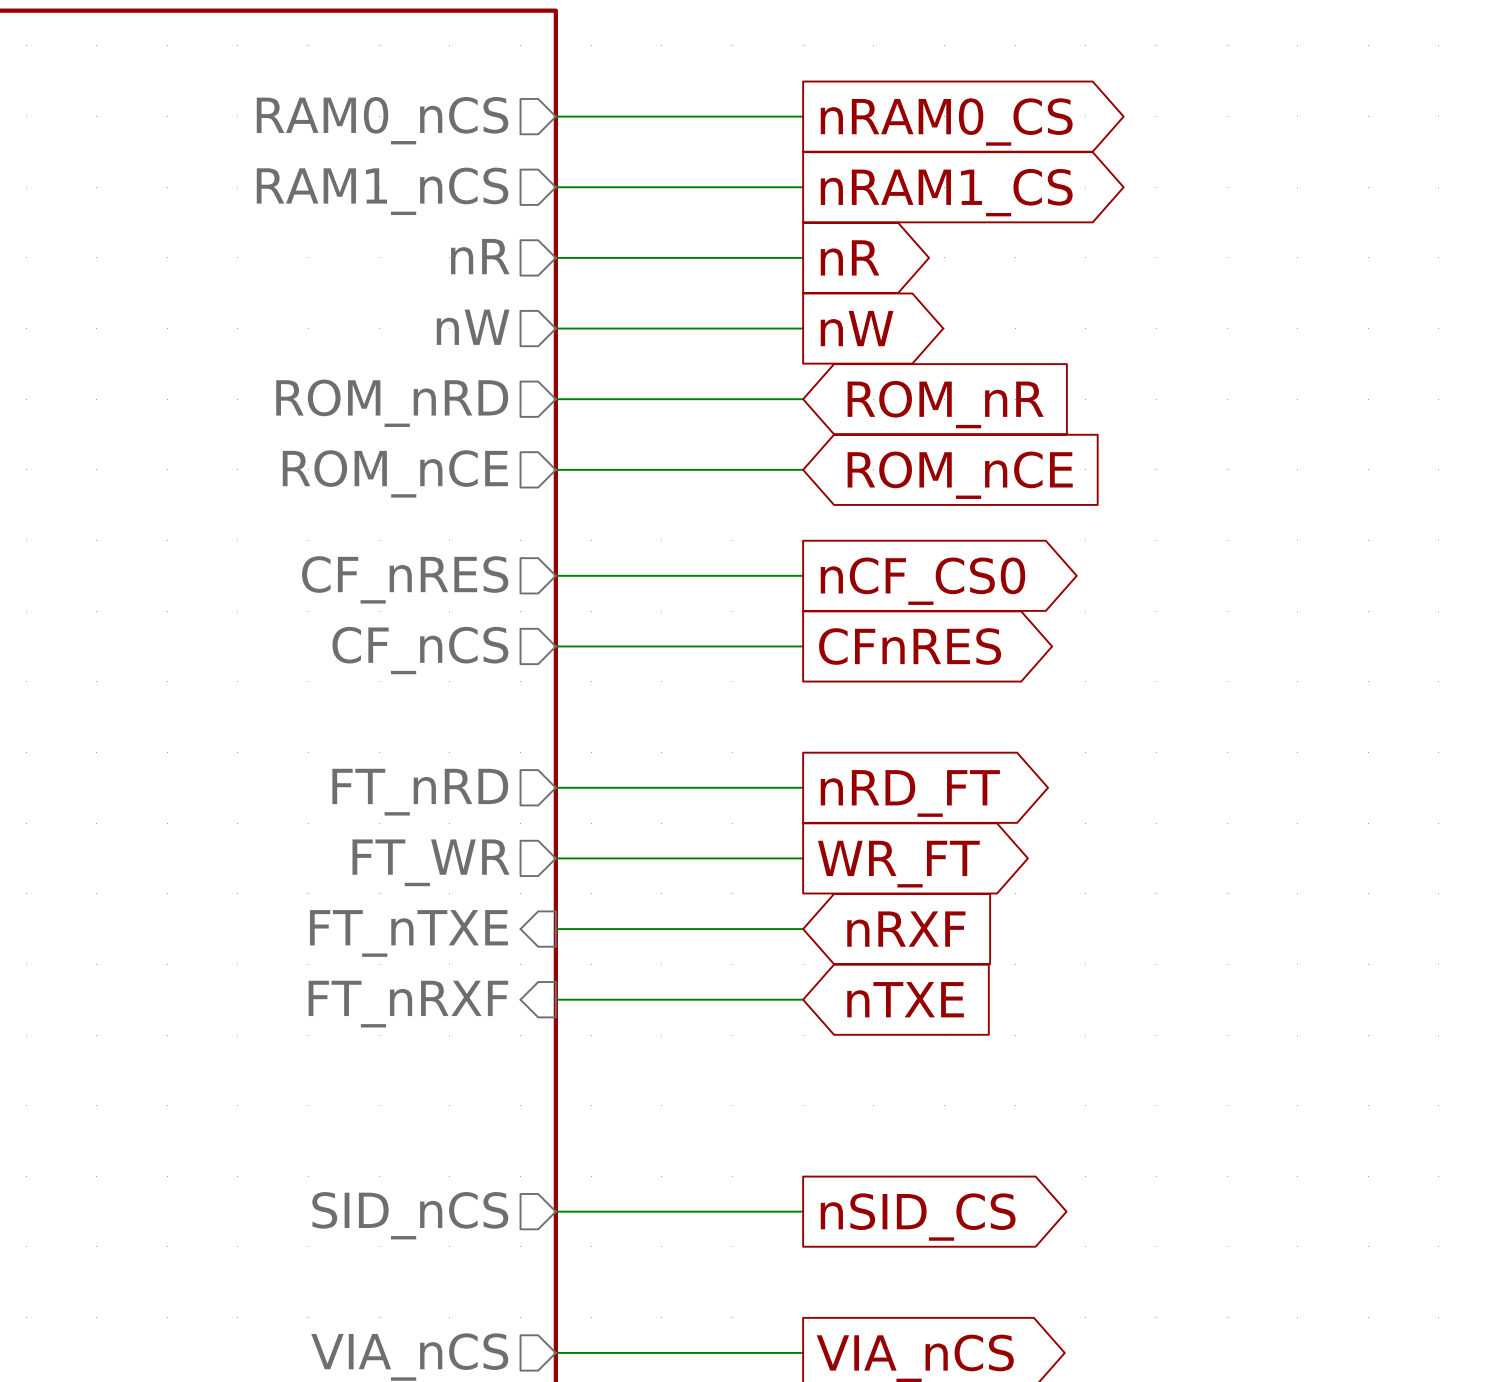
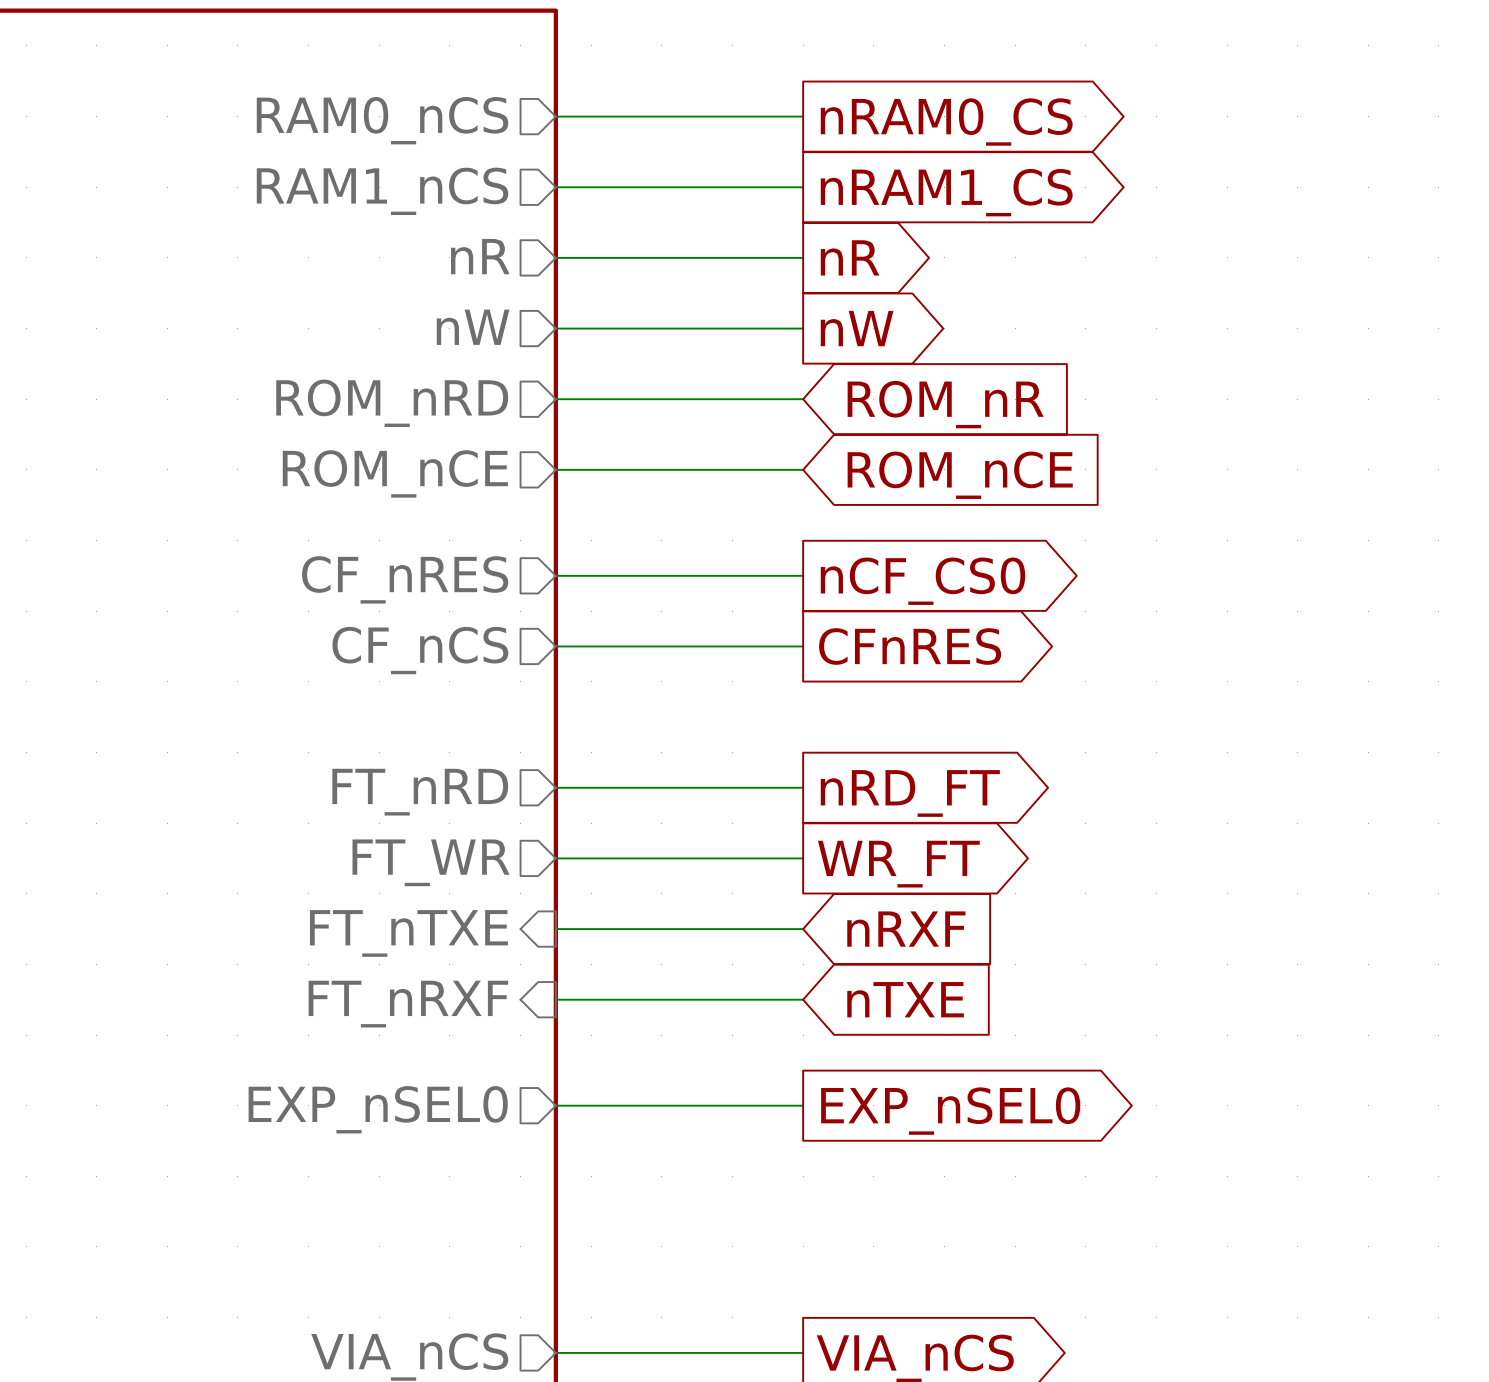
sheet pin: none -> EXP_nSEL0 (378, 1109)
global label: none -> EXP_nSEL0 (950, 1111)
wire: (555, 1211) (803, 1211) -> (555, 1105) (803, 1105)
sheet pin: SID_nCS (410, 1215) -> none
global label: nSID_CS (918, 1217) -> none

